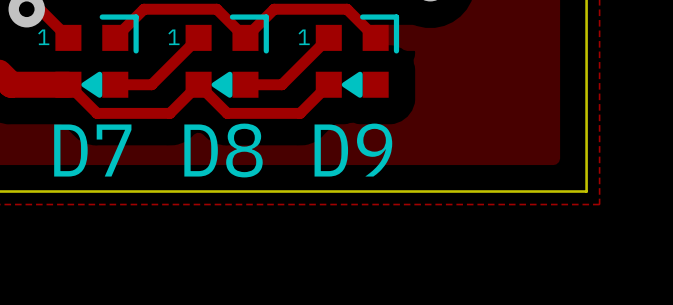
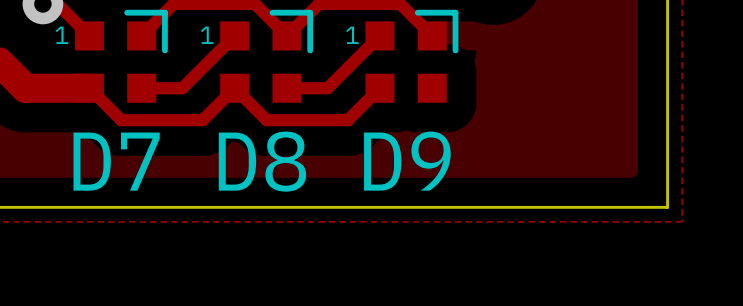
D7 footprint: [55, 14, 139, 98] -> [74, 9, 168, 103]
D8 footprint: [185, 14, 269, 98] -> [220, 9, 314, 103]
D9 footprint: [315, 14, 400, 98] -> [365, 9, 459, 103]

